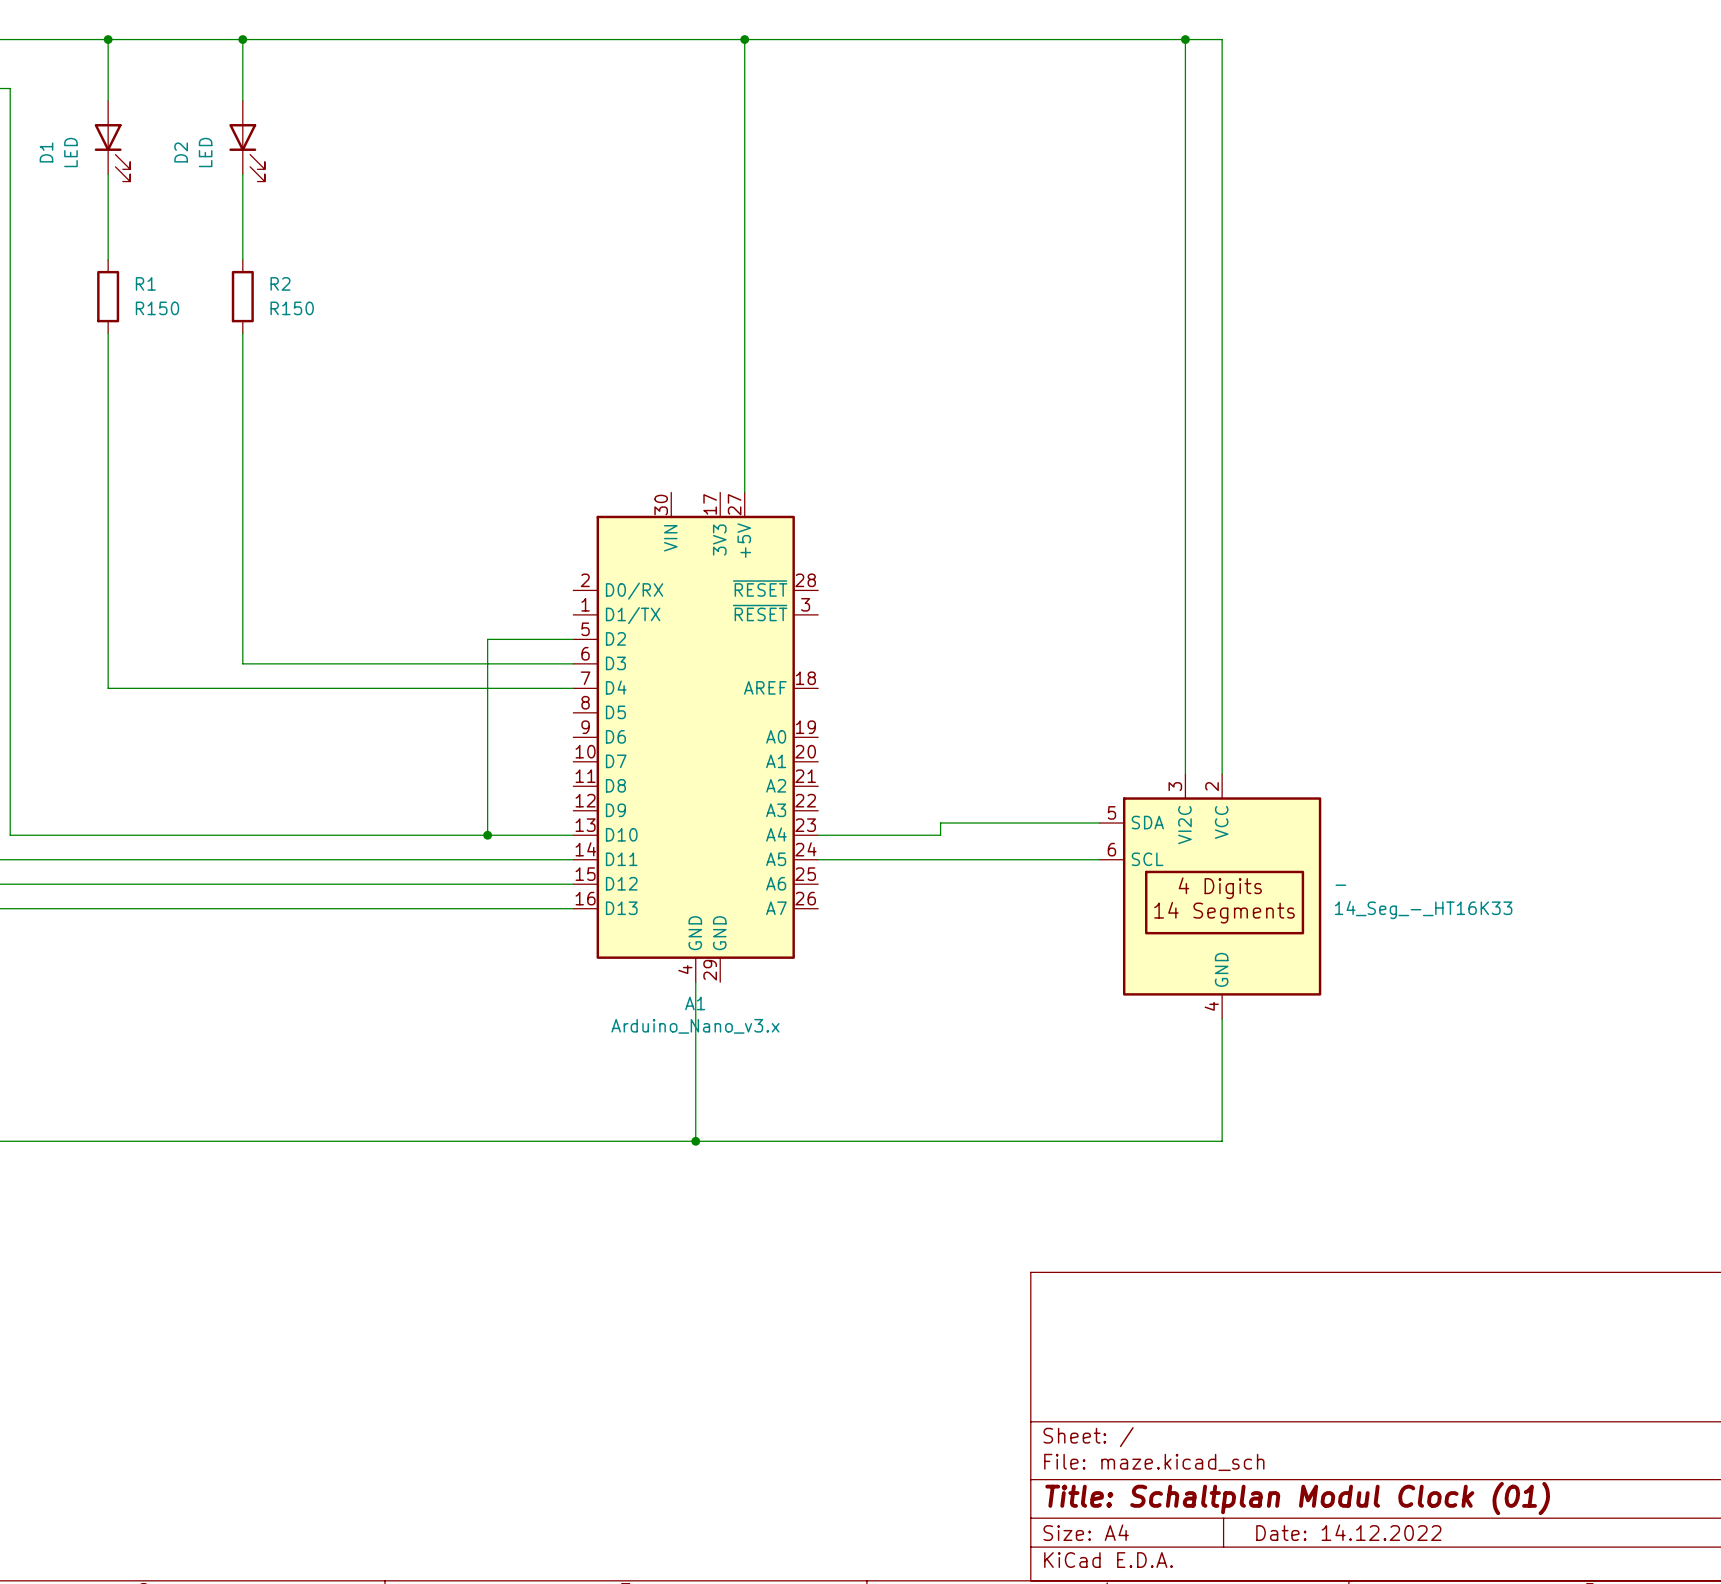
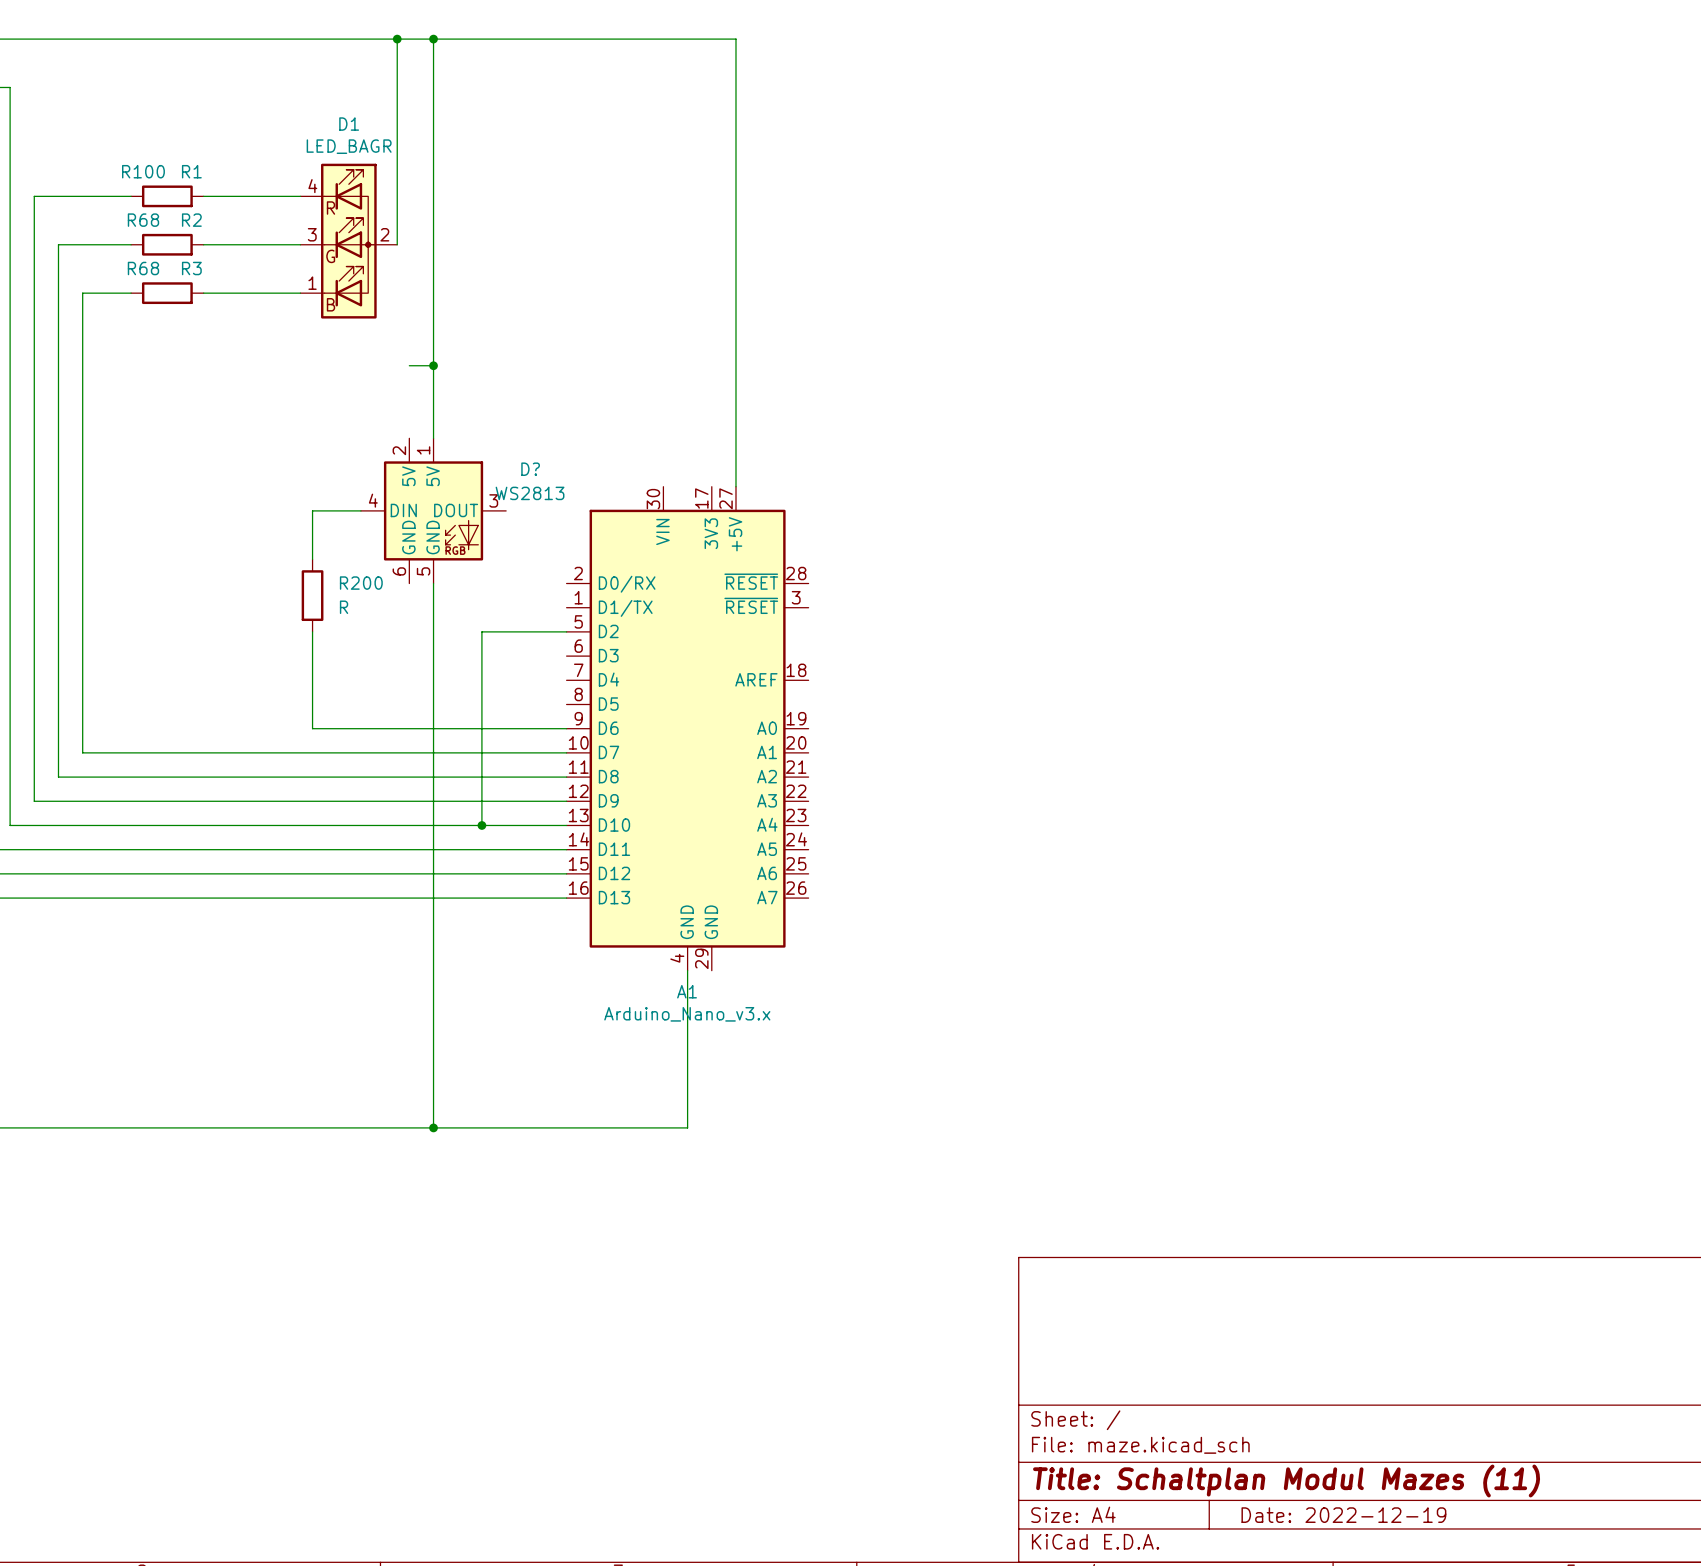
wire: (108, 39) (108, 100) -> none
junction: (108, 39) -> none
wire: (242, 39) (242, 100) -> none
junction: (242, 39) -> none
wire: none -> (397, 39) (397, 244)
junction: none -> (397, 39)
wire: none -> (433, 39) (433, 438)
junction: none -> (433, 39)
wire: (744, 39) (1222, 39) (1222, 774) -> none
junction: (744, 39) -> none
wire: (1185, 39) (1185, 774) -> none
junction: (1185, 39) -> none
D1 symbol: [94, 100, 131, 182] -> [300, 163, 398, 319]
D2: LED (247, 141) -> none
D1 name position: D1 (46, 152) -> D1 (349, 124)
D1 value: LED (70, 152) -> LED_BAGR (349, 146)
wire: (108, 174) (108, 259) -> none
wire: (242, 174) (242, 259) -> none
wire: none -> (131, 196) (34, 196) (34, 801) (566, 801)
wire: none -> (203, 196) (300, 196)
wire: none -> (131, 244) (58, 244) (58, 777) (566, 777)
wire: none -> (203, 244) (300, 244)
R1 name position: R1 (145, 283) -> R1 (191, 171)
R2 name position: R2 (280, 283) -> R2 (191, 220)
R1 rotation: 0° (108, 296) -> 90° clockwise (167, 196)
R1 position: (108, 296) -> (167, 196)
wire: none -> (131, 293) (82, 293) (82, 752) (566, 752)
R3: none -> R68 (167, 293)
wire: none -> (203, 293) (300, 293)
R2 rotation: 0° (242, 296) -> 90° clockwise (167, 244)
R2 position: (242, 296) -> (167, 244)
R1 value: R150 (157, 308) -> R100 (143, 171)
R2 value: R150 (292, 308) -> R68 (143, 220)
wire: (108, 333) (108, 688) (573, 688) -> none
wire: (242, 333) (242, 663) (573, 663) -> none
wire: none -> (409, 365) (433, 365)
junction: none -> (433, 365)
wire: none -> (360, 510) (312, 510) (312, 559)
D?: none -> WS2813 (433, 510)
wire: none -> (433, 583) (433, 1127)
R200: none -> R (312, 595)
wire: none -> (312, 631) (312, 728) (566, 728)
wire: (1099, 823) (940, 823) (940, 835) (818, 835) -> none
wire: (818, 859) (1099, 859) -> none
part: 14_Seg_-_HT16K33 (1210, 896) -> none
wire: (1222, 1018) (1222, 1141) (695, 1141) -> none
junction: none -> (433, 1127)
junction: (695, 1141) -> none
title block: Title: Schaltplan Modul Clock (01) (1297, 1498) -> Title: Schaltplan Modul Mazes (11) (1286, 1481)
title block: Date: 14.12.2022 (1348, 1532) -> Date: 2022-12-19 (1343, 1515)

